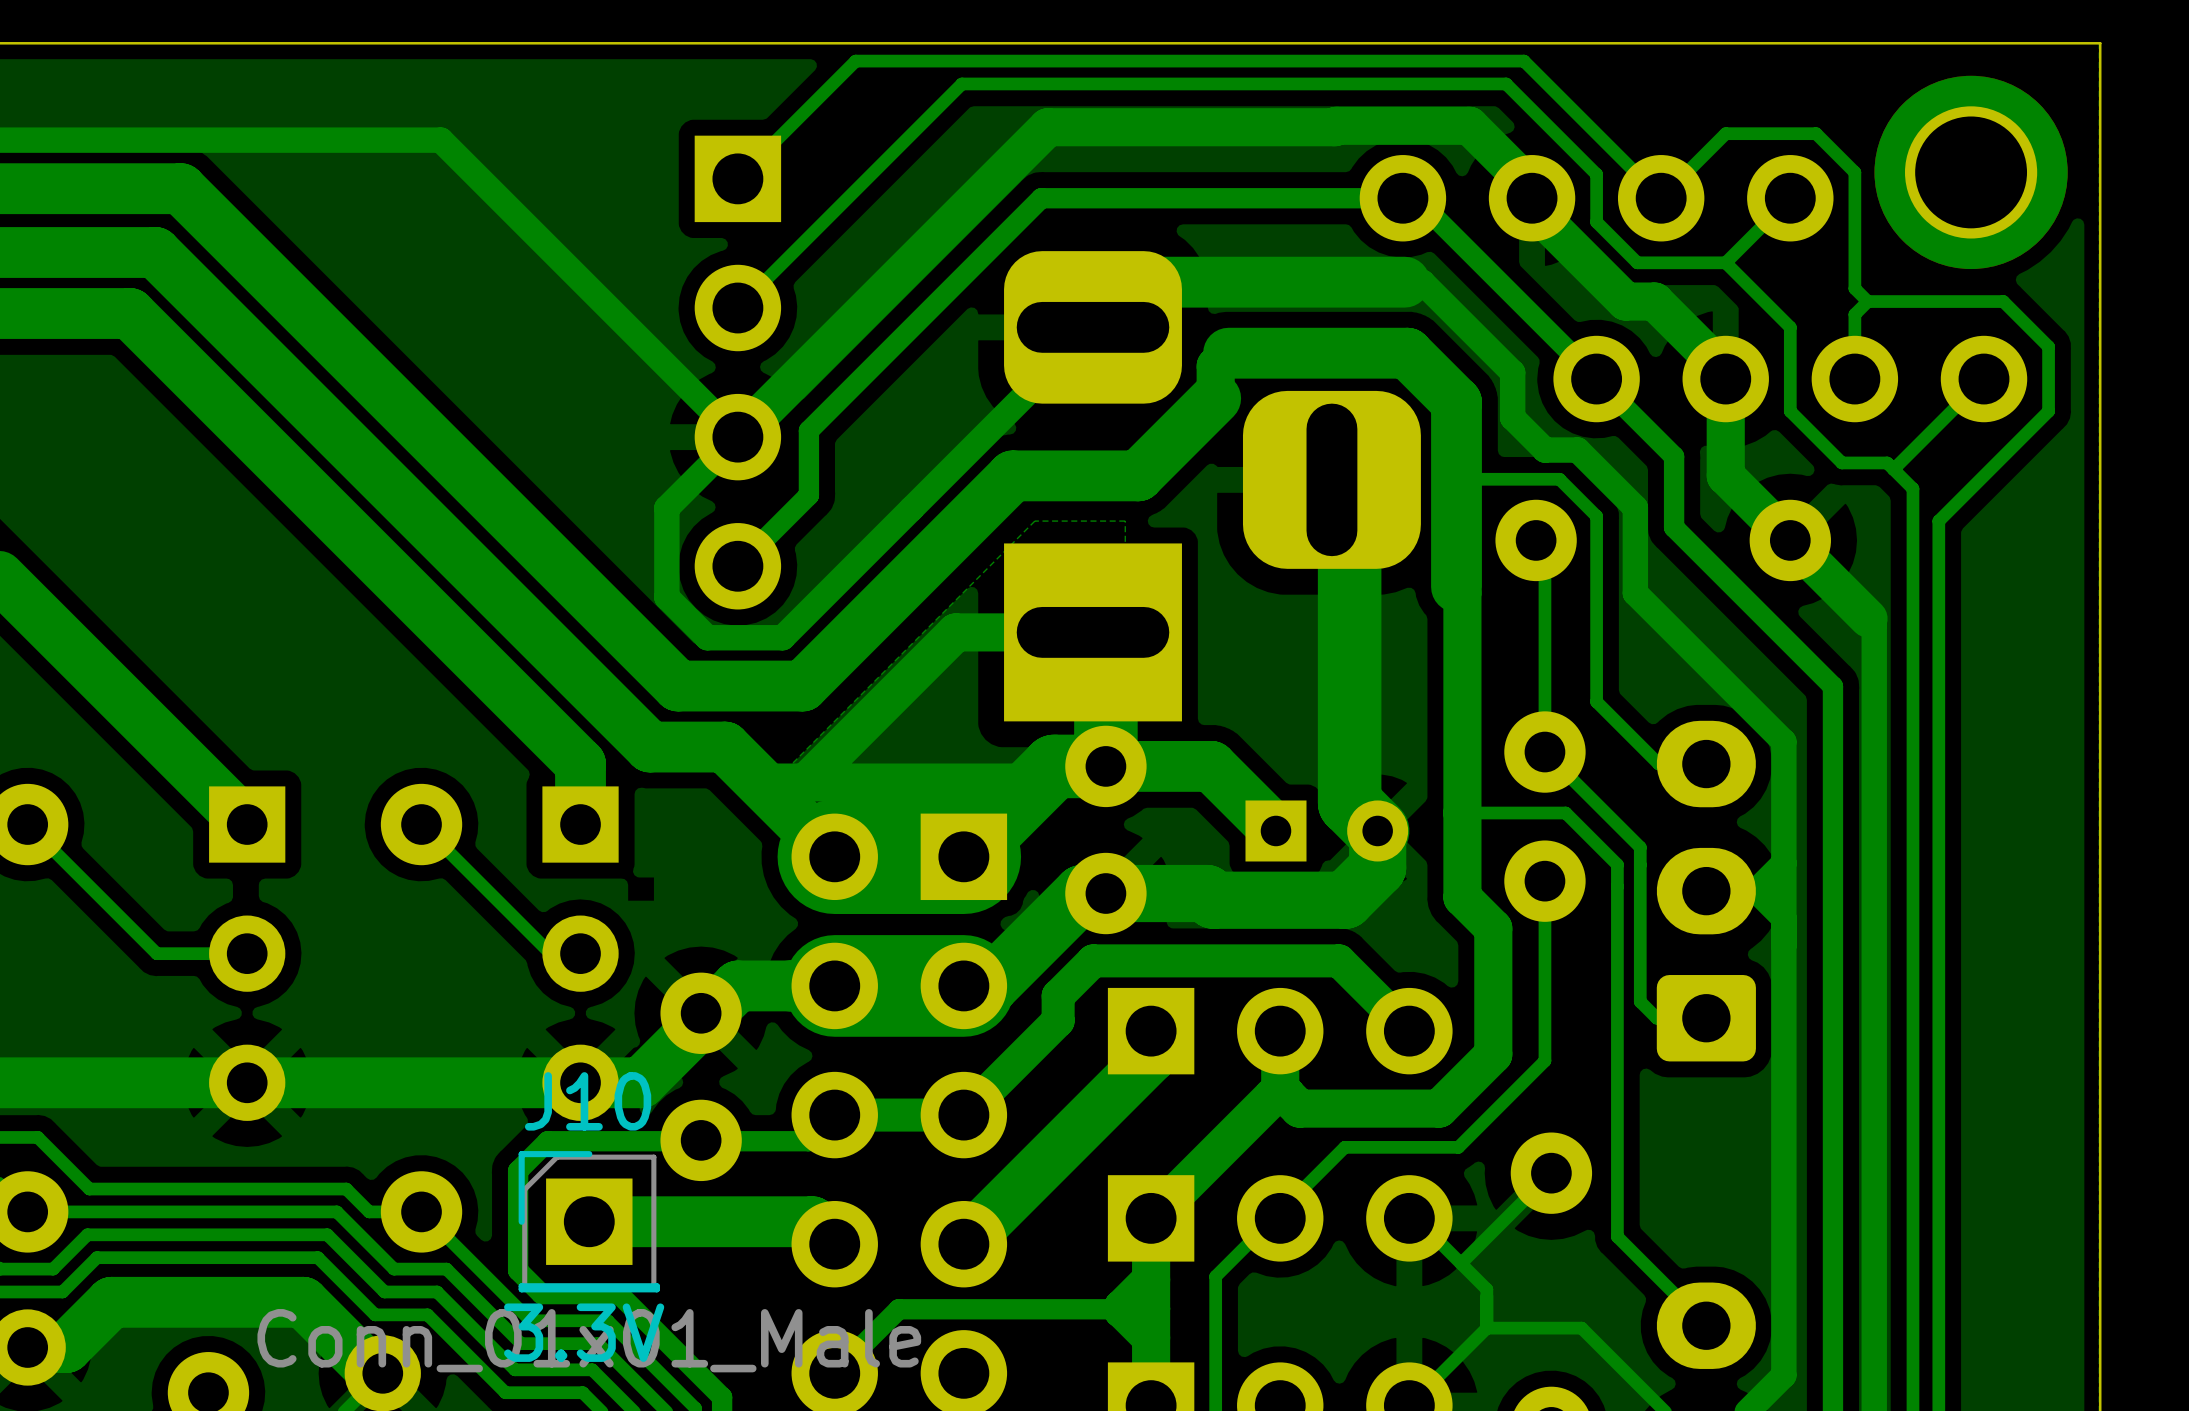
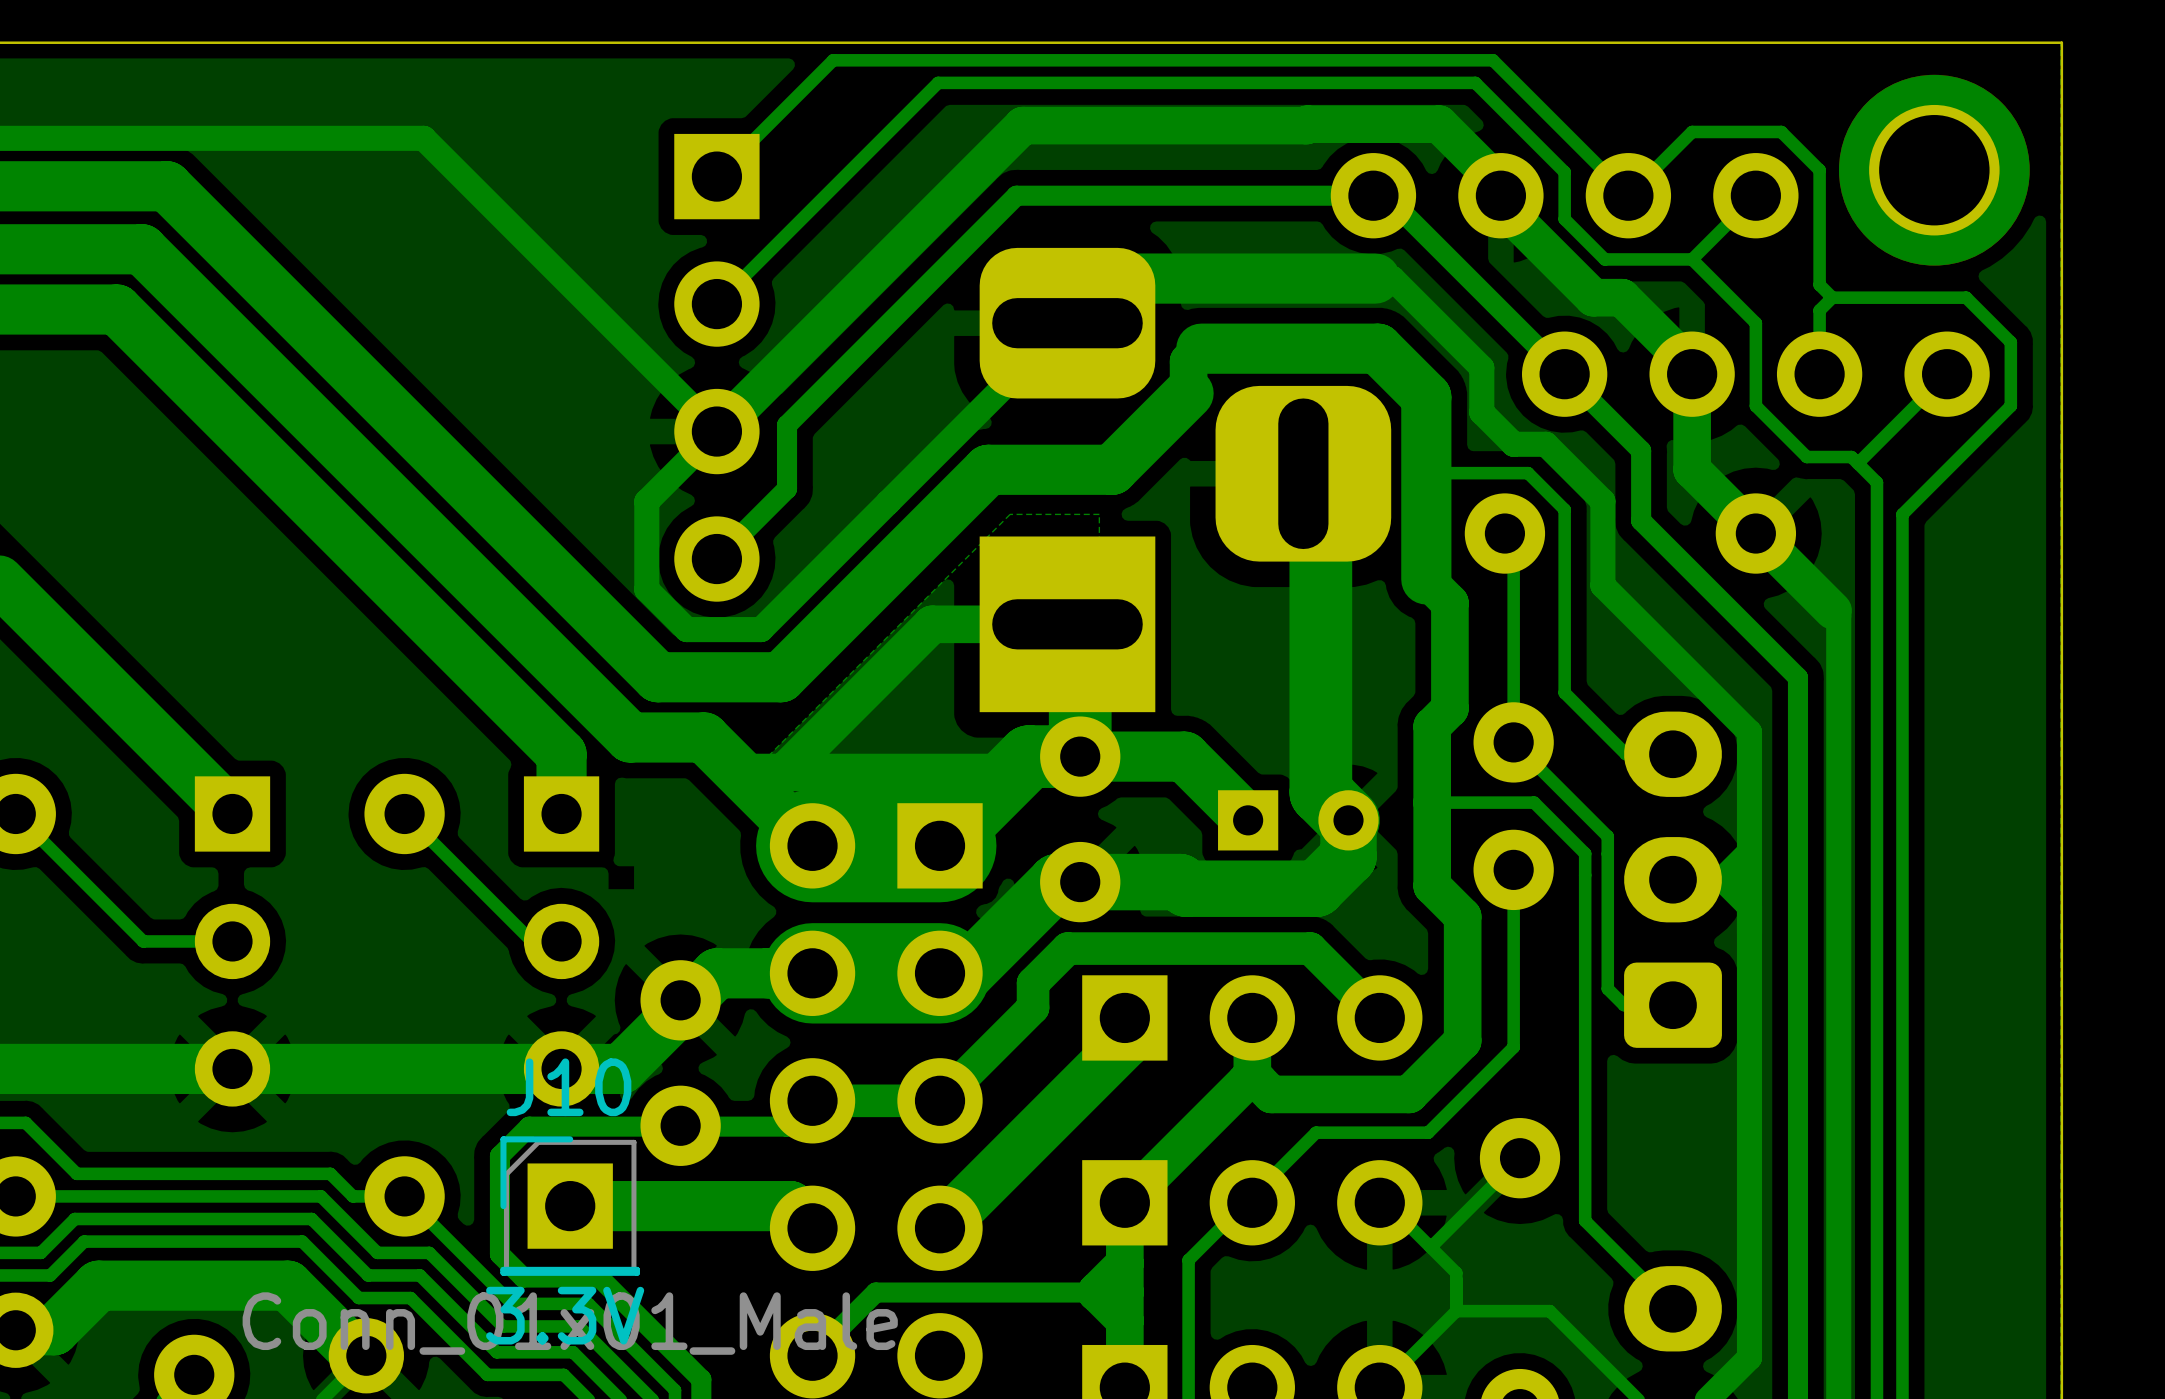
bottom track: (1462, 592) (1462, 735) -> (1432, 585) (1449, 603) (1449, 708) (1432, 726)

